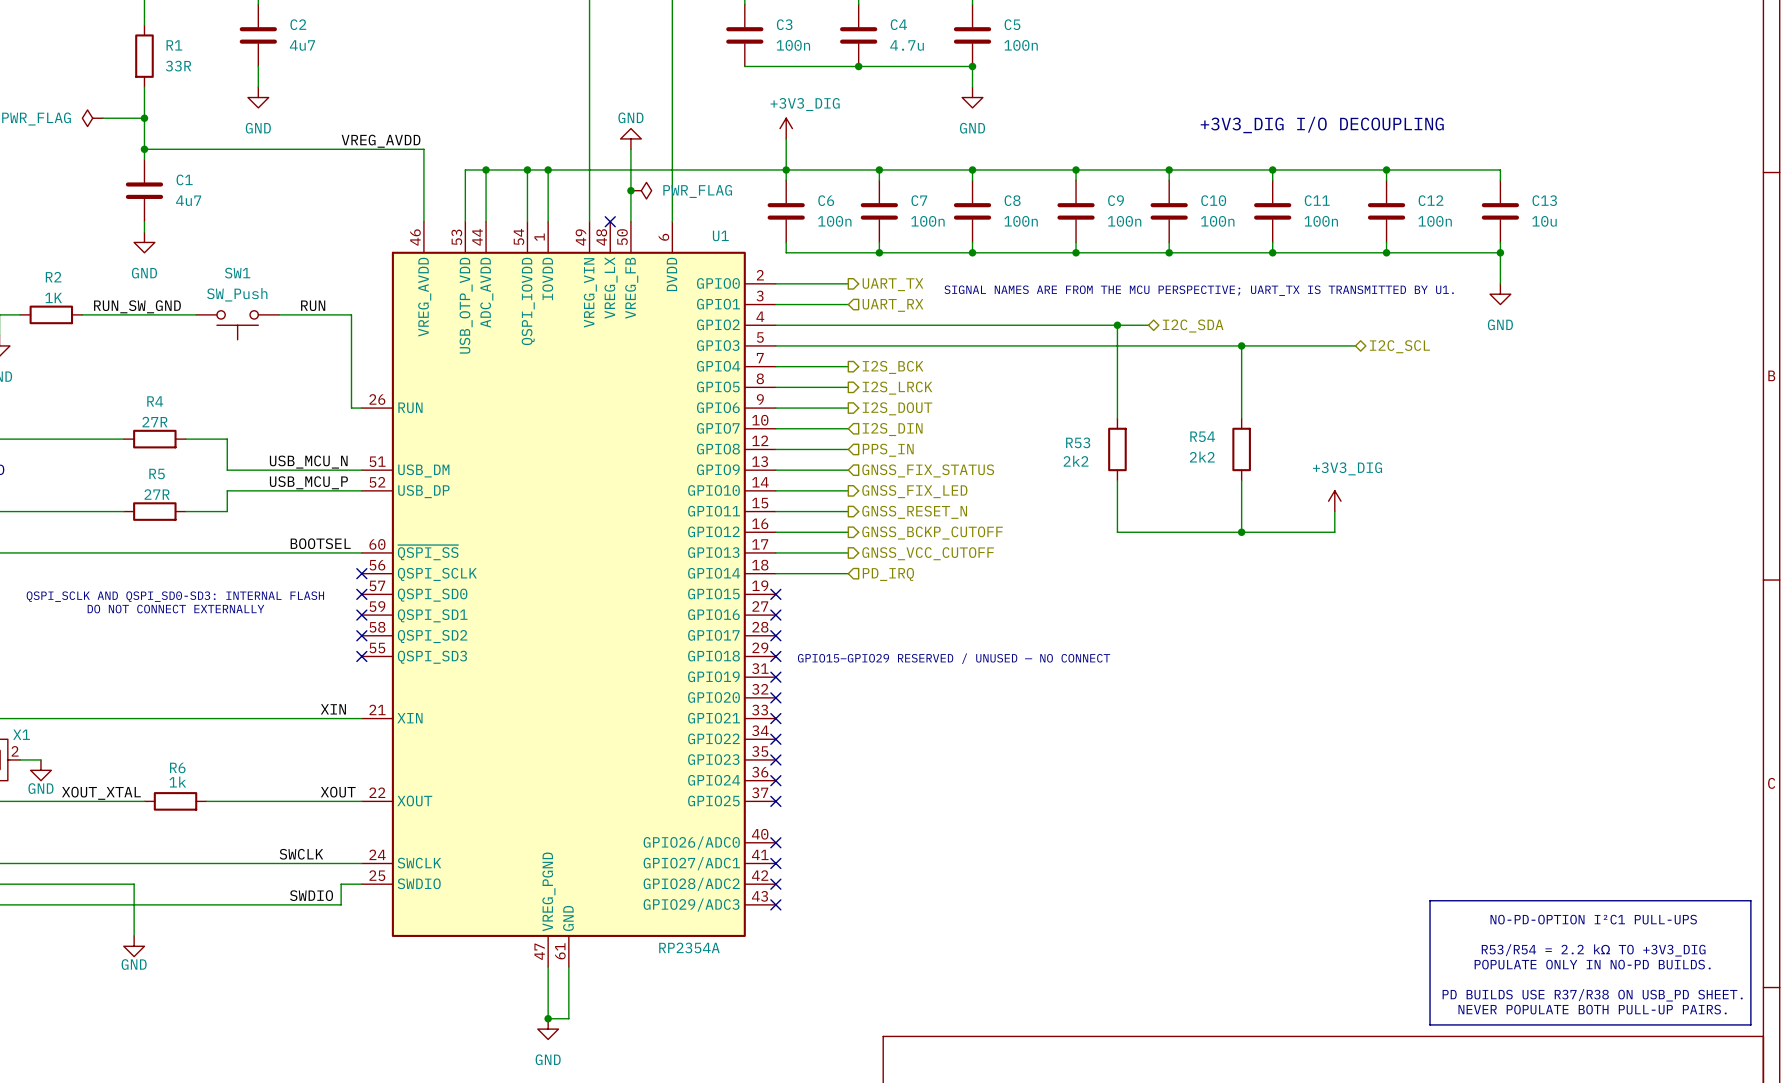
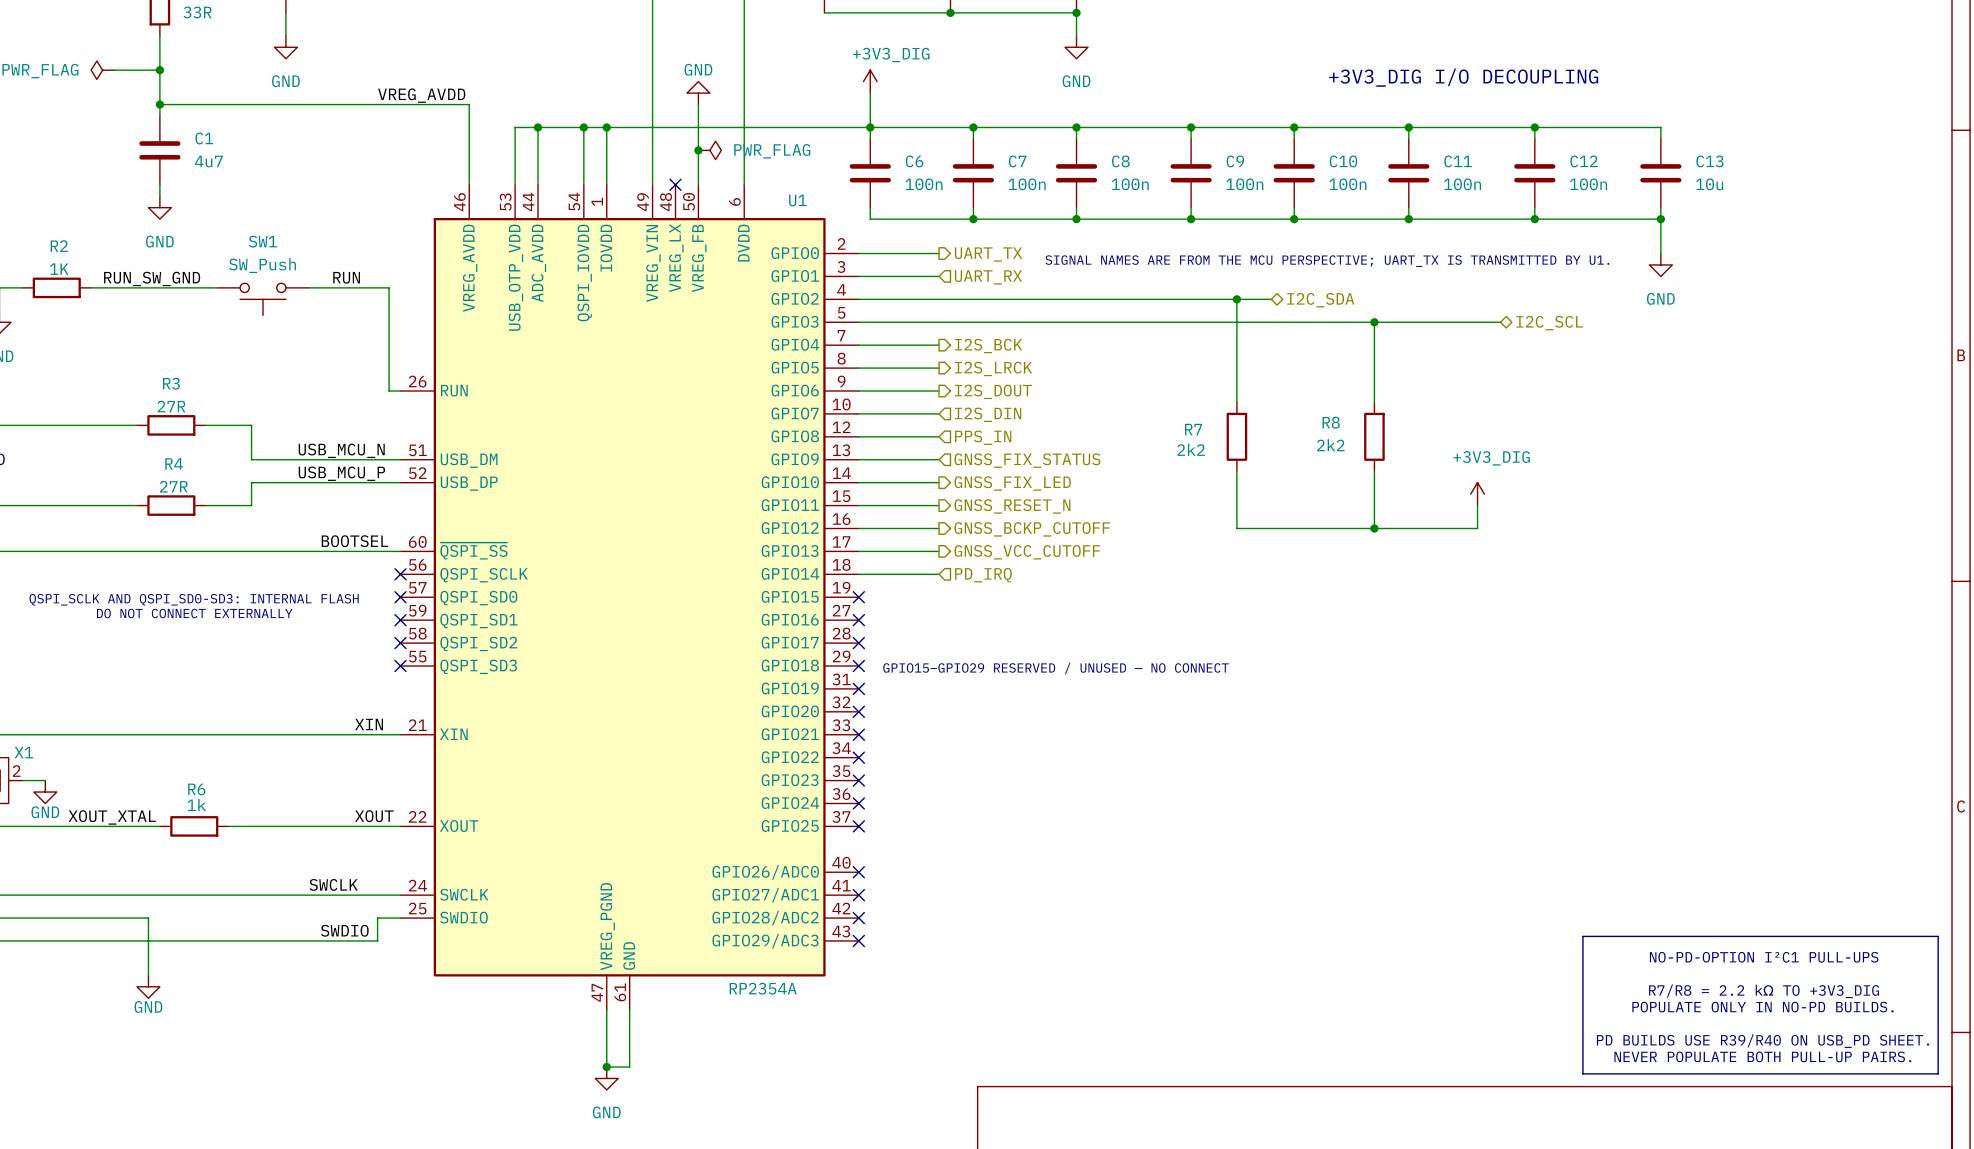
R4 name: R4 (155, 401) -> R3 (171, 383)
R54 name: R54 (1202, 436) -> R8 (1331, 422)
R53 name: R53 (1078, 442) -> R7 (1193, 429)
R5 name: R5 (157, 474) -> R4 (174, 463)
text: R53/R54 = 2.2 kΩ TO +3V3_DIG (1593, 950) -> R7/R8 = 2.2 kΩ TO +3V3_DIG (1764, 991)
text: PD BUILDS USE R37/R38 ON USB_PD SHEET. (1592, 995) -> PD BUILDS USE R39/R40 ON USB_PD SHEET. (1762, 1041)

